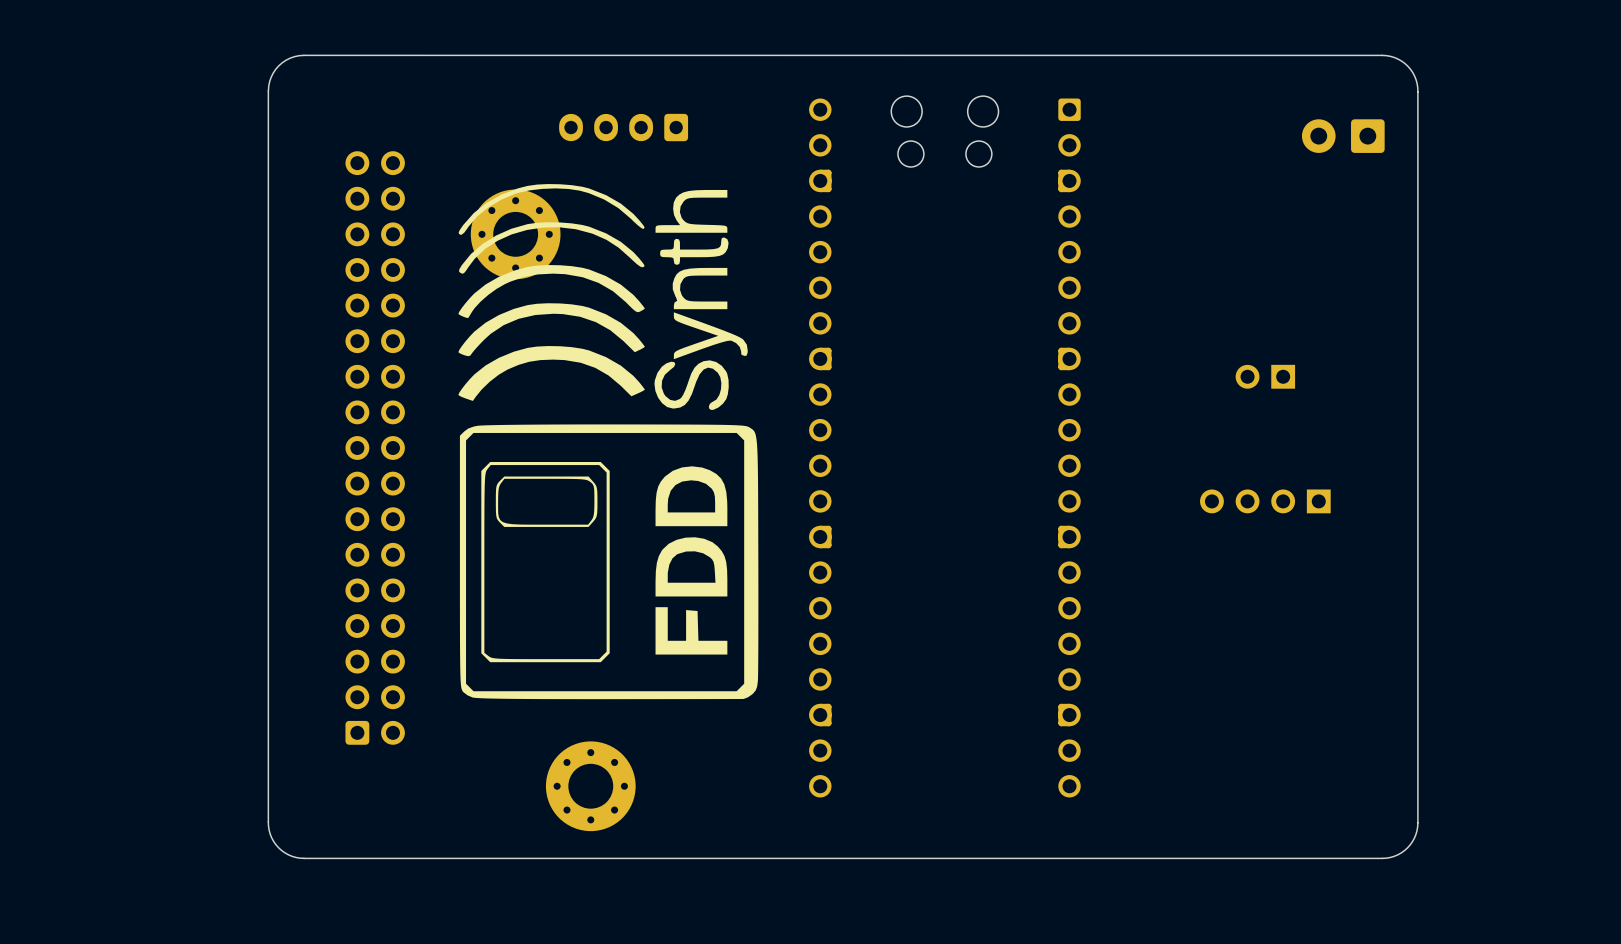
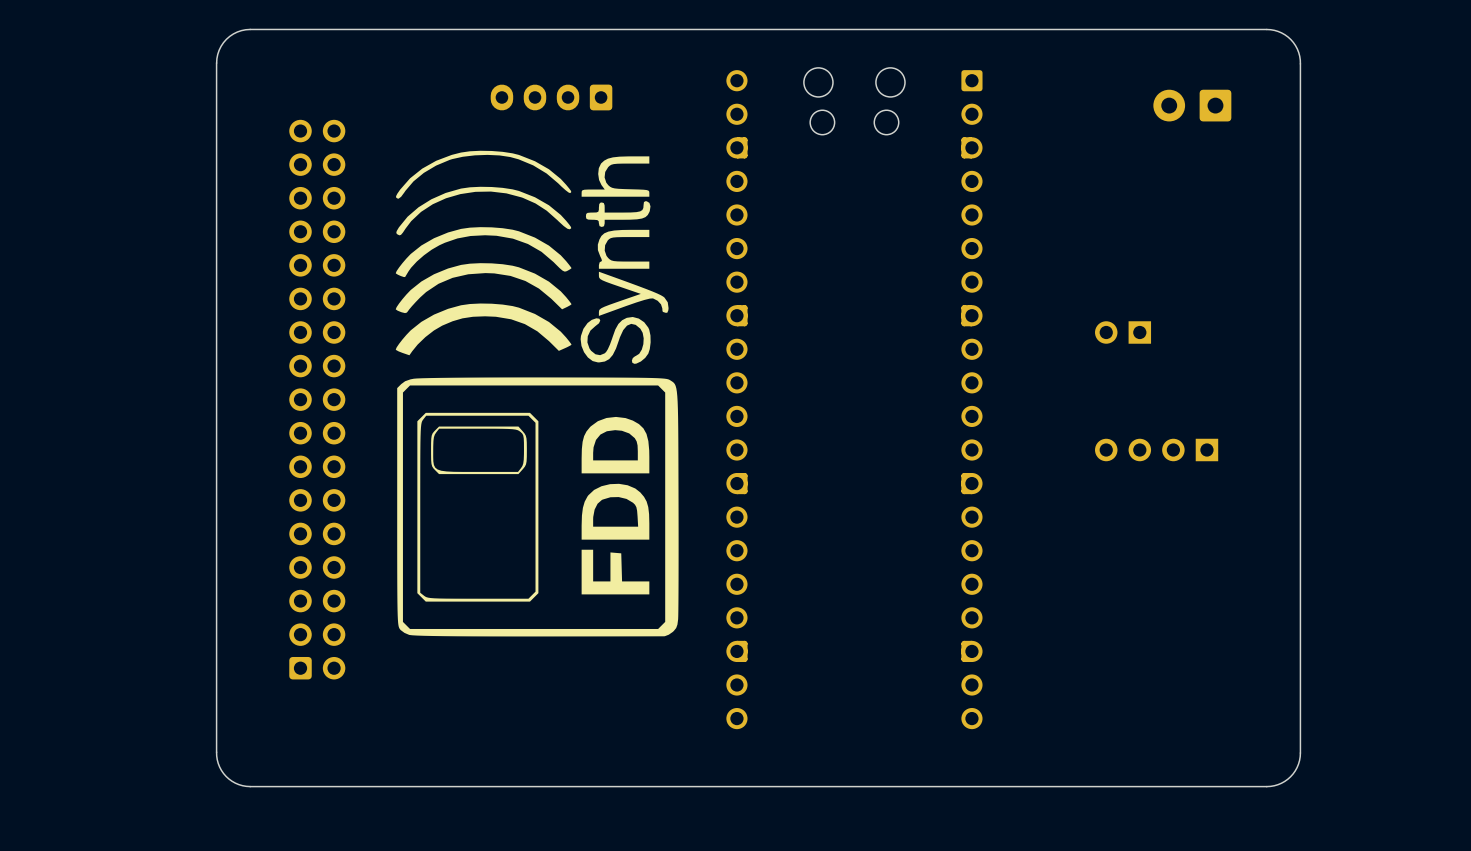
part position: (1343, 136) -> (1192, 105)
part: (515, 234) -> none
part position: (1265, 376) -> (1123, 332)
part: (590, 786) -> none

